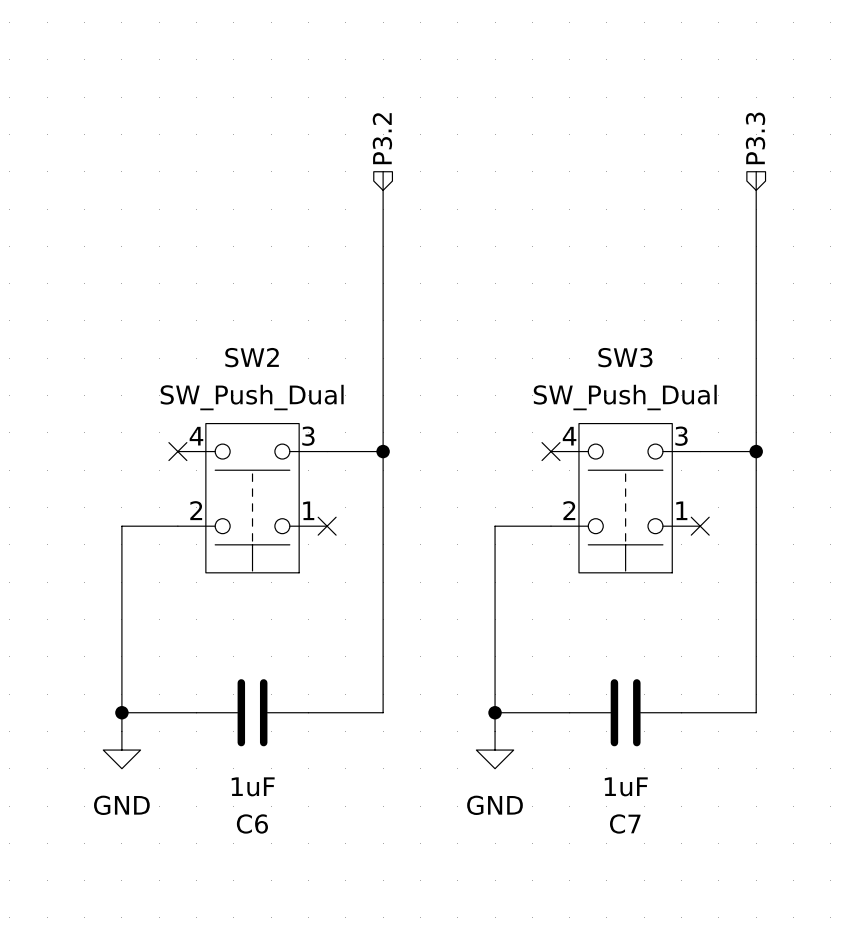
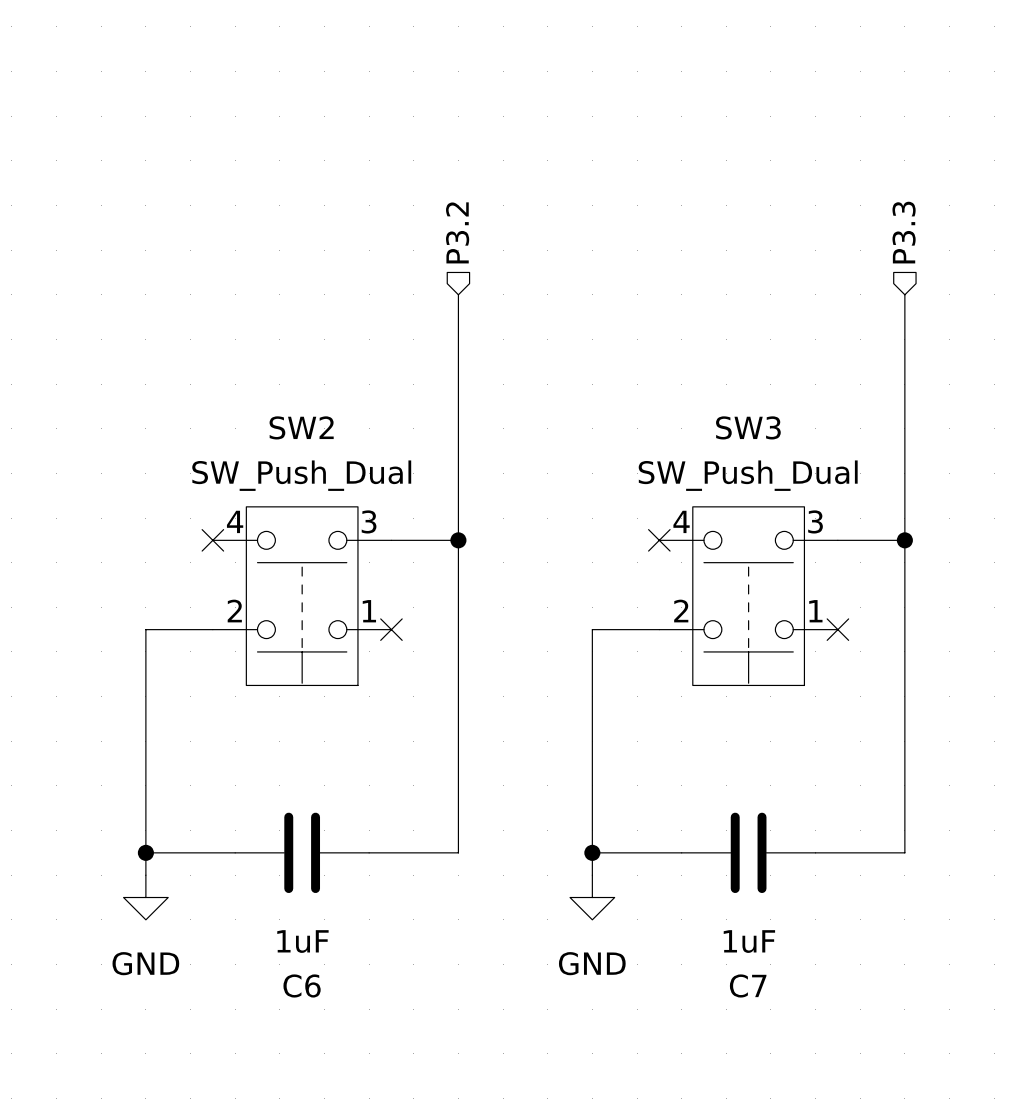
hierarchical label position: P3.2 (382, 138) -> P3.2 (457, 232)
hierarchical label position: P3.3 (755, 138) -> P3.3 (904, 232)
wire: (383, 171) (383, 246) -> none
wire: (756, 171) (756, 246) -> none

